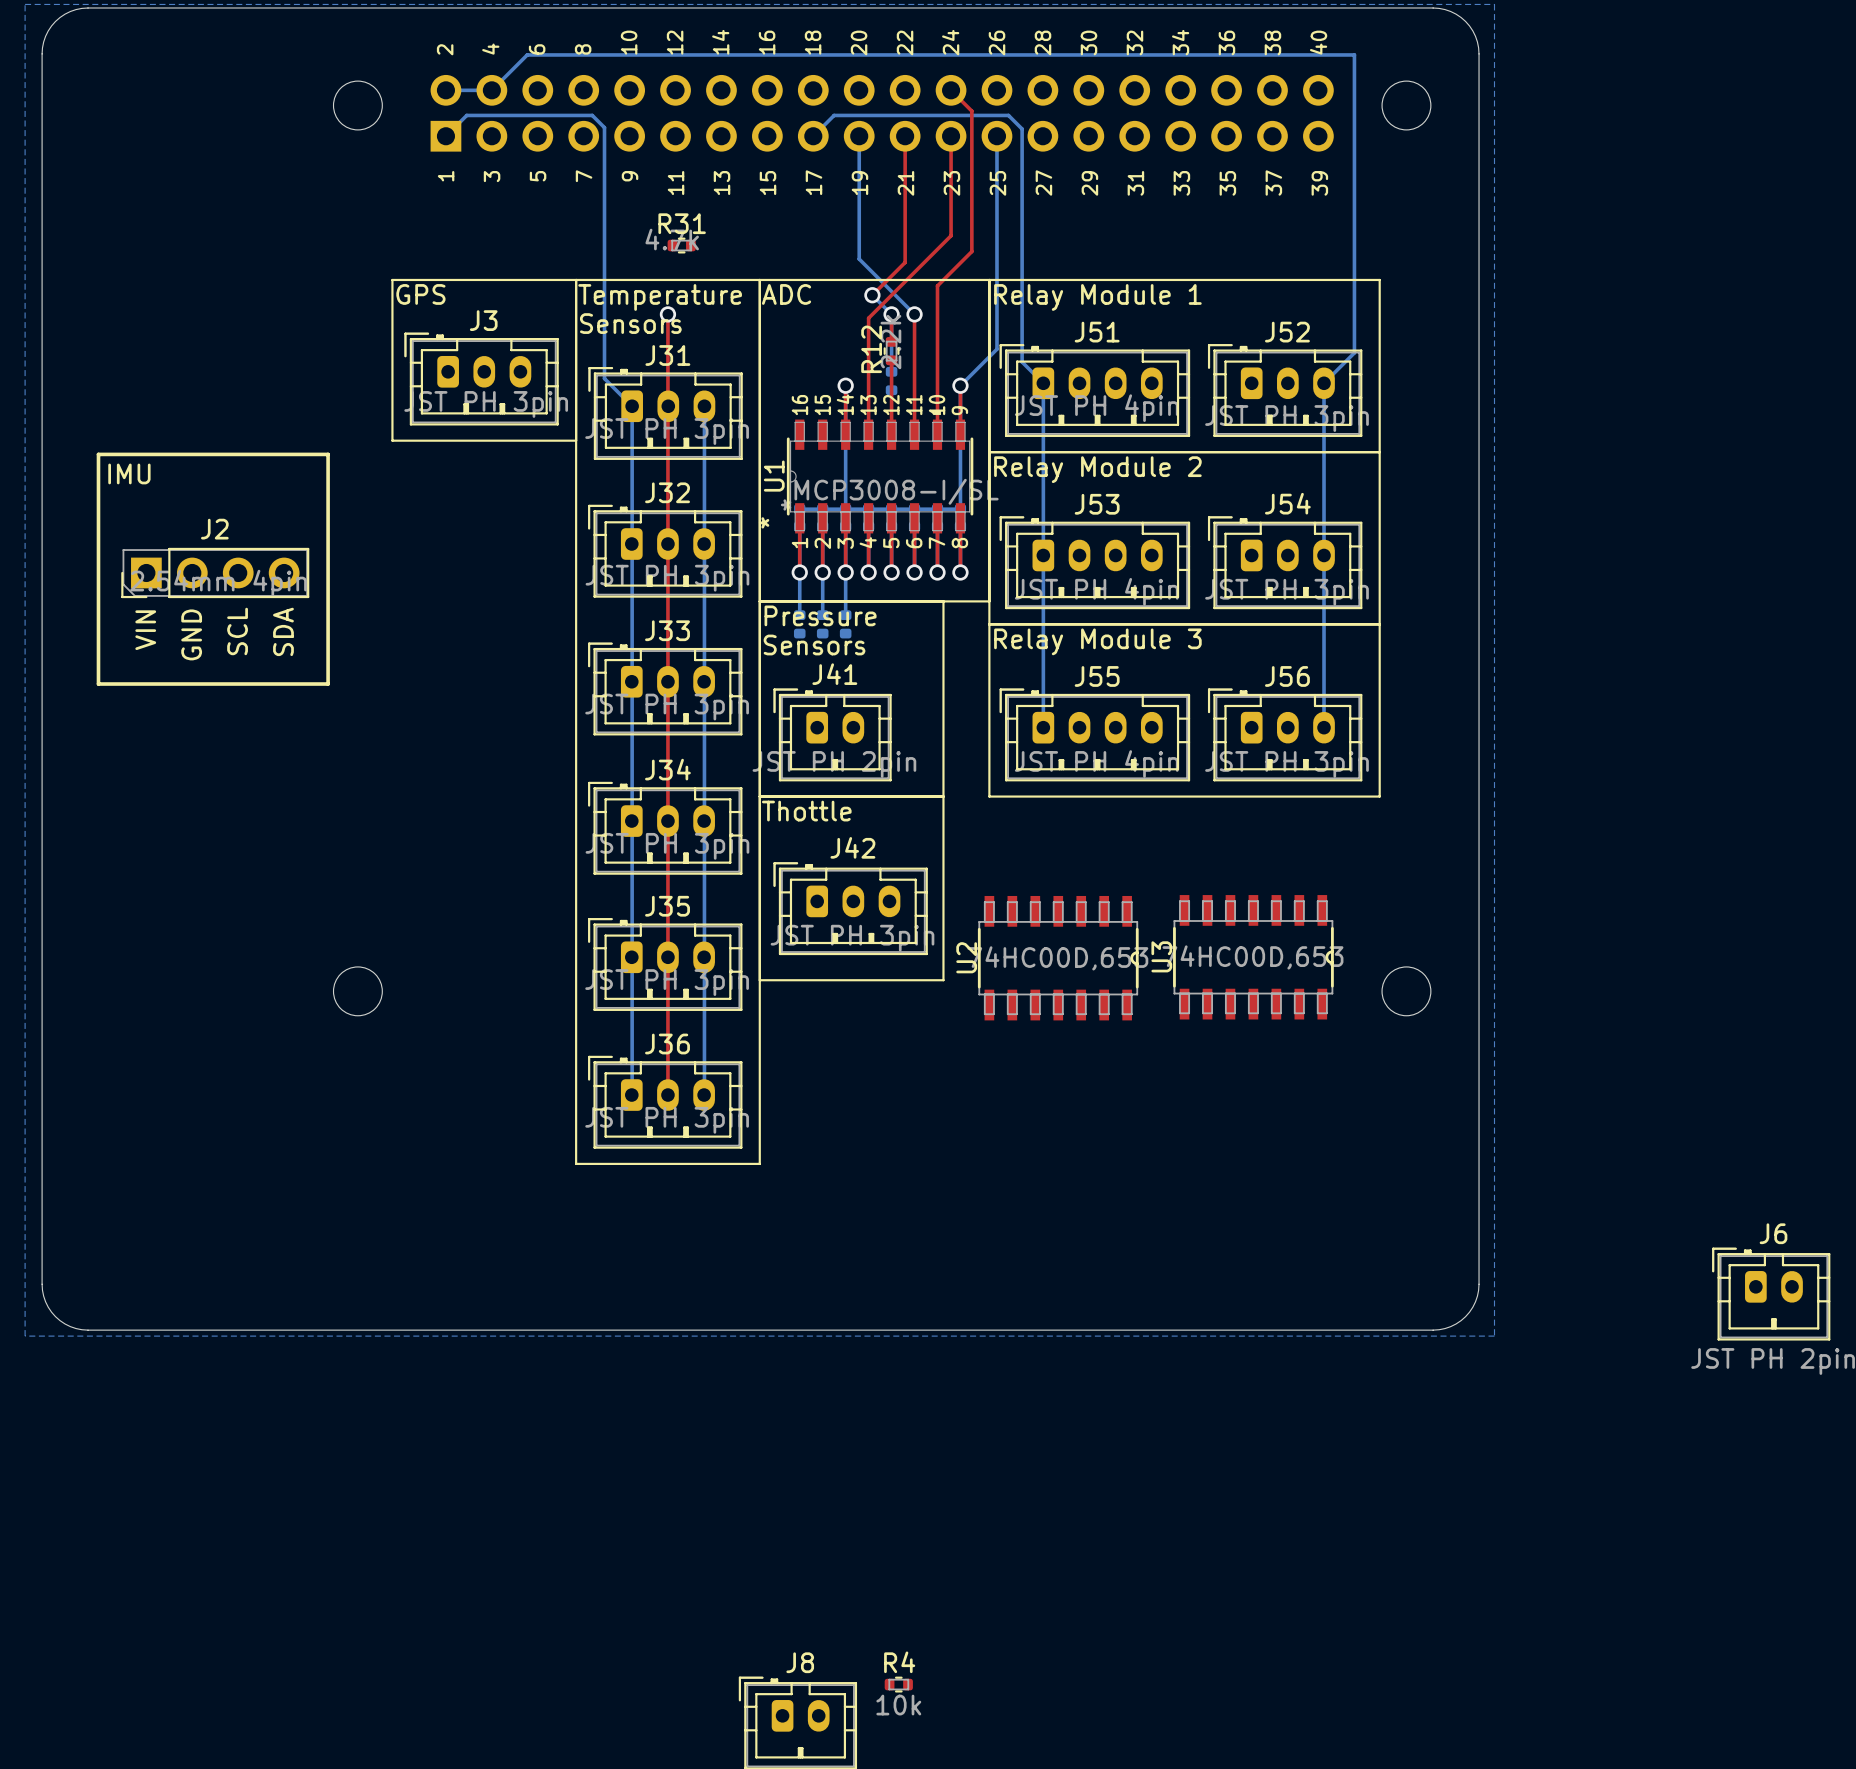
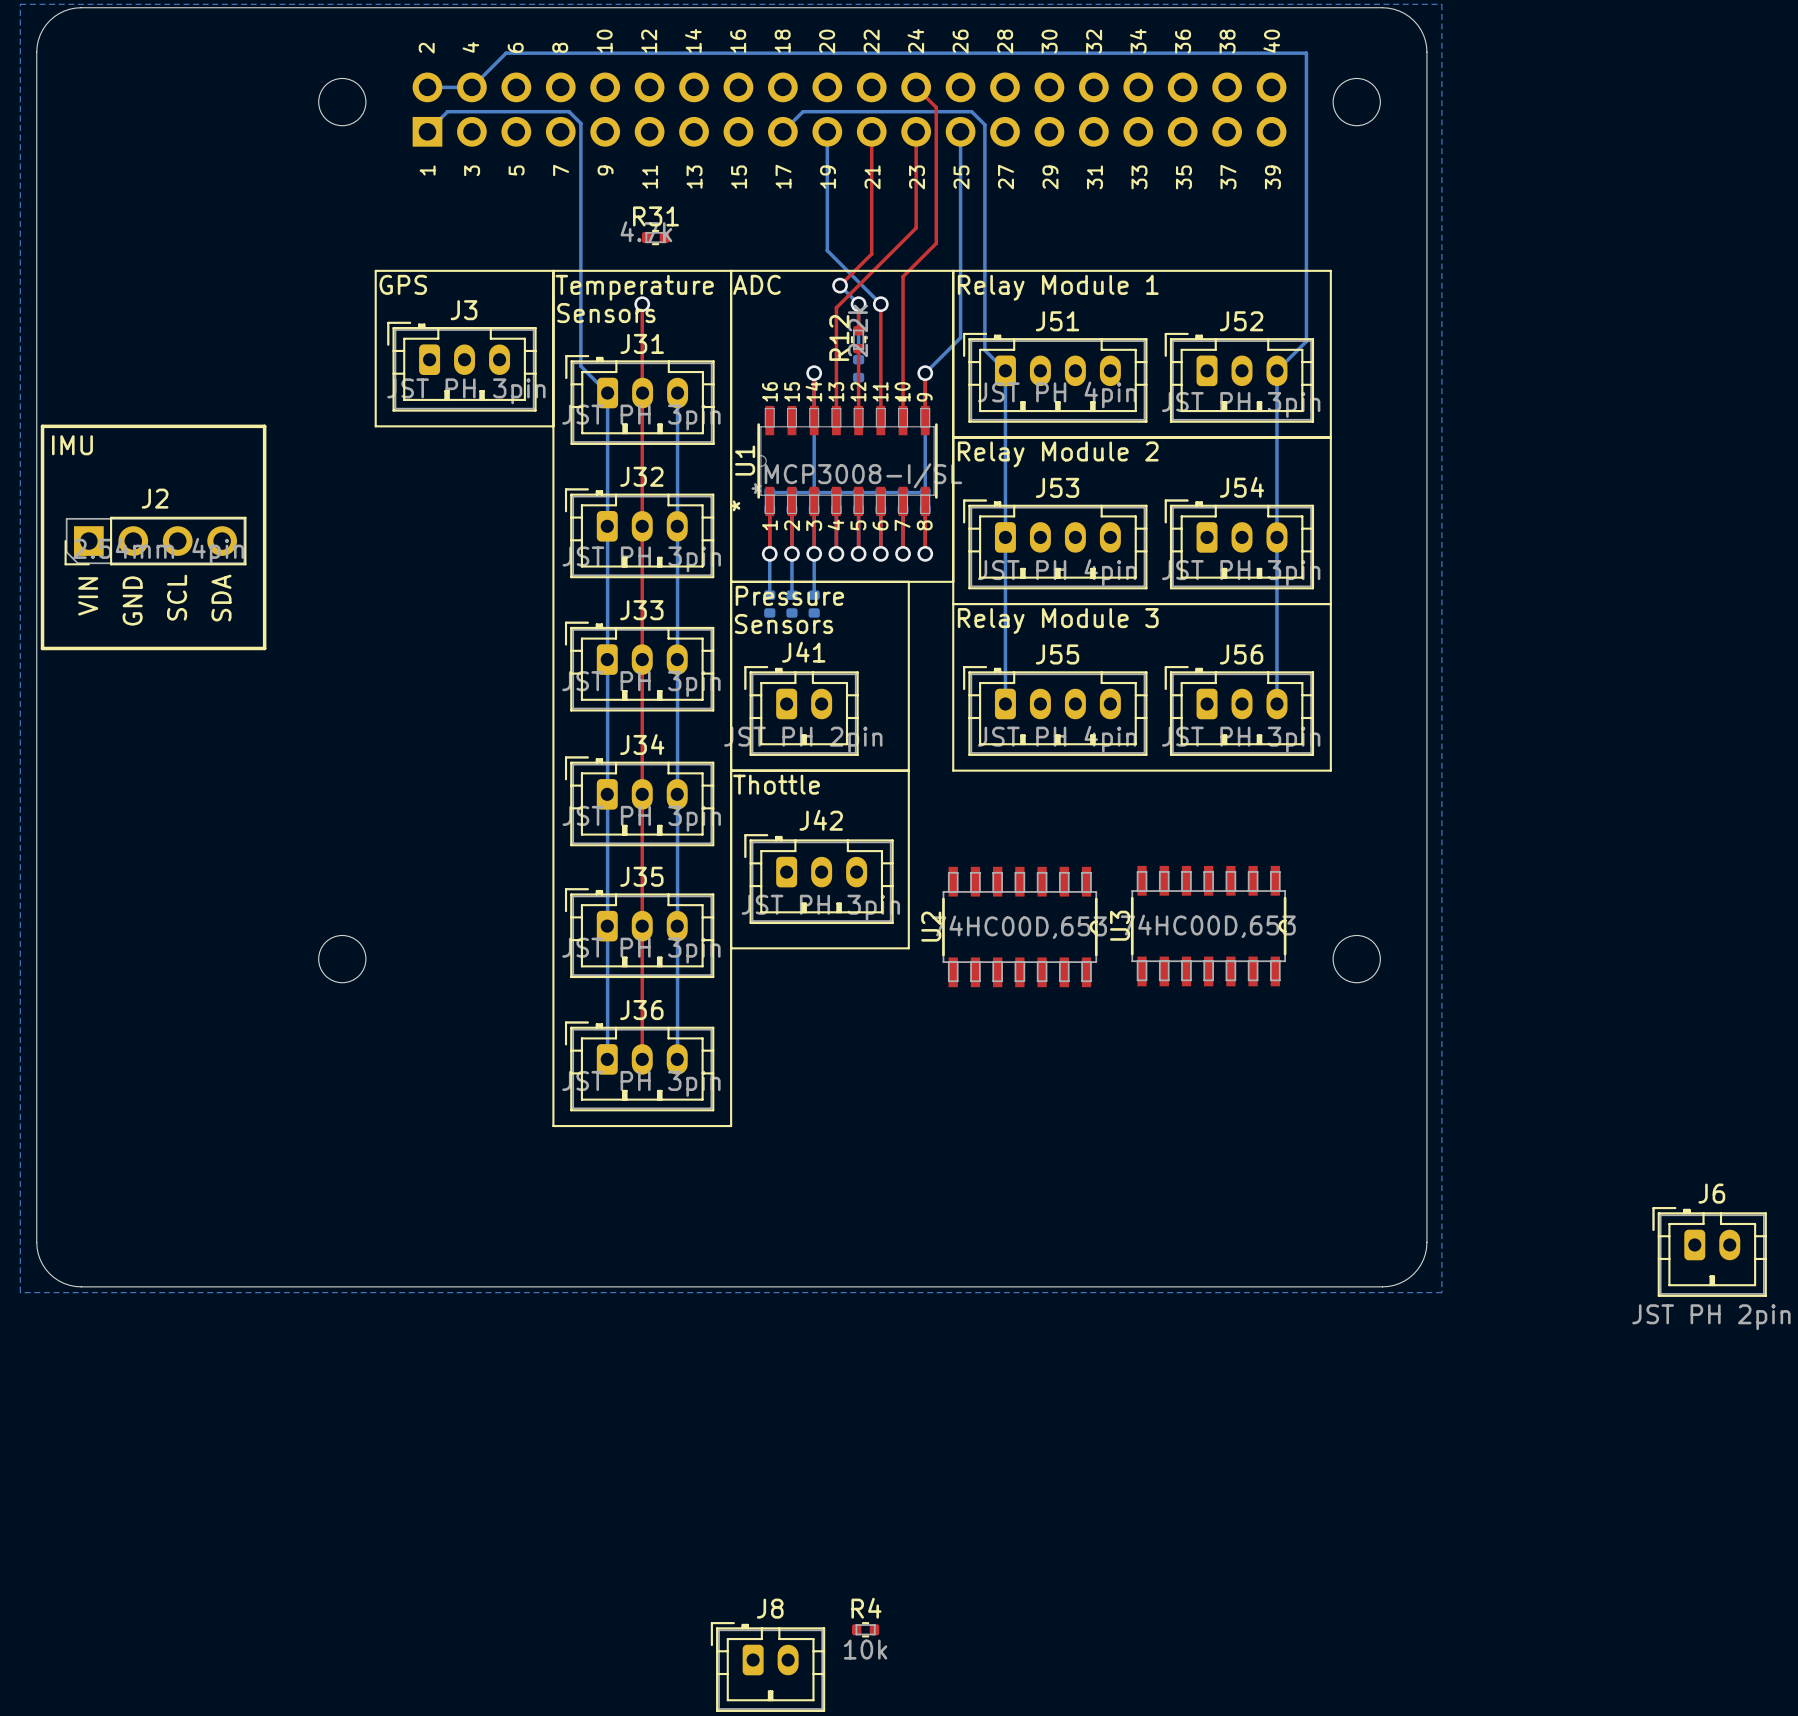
line: (98, 454) (328, 454) (328, 684) (98, 684) (98, 454) -> (42, 426) (42, 648) (264, 648) (264, 426) (42, 426)
text position: IMU (129, 473) -> IMU (72, 445)
J2 position: (215, 572) -> (155, 541)

